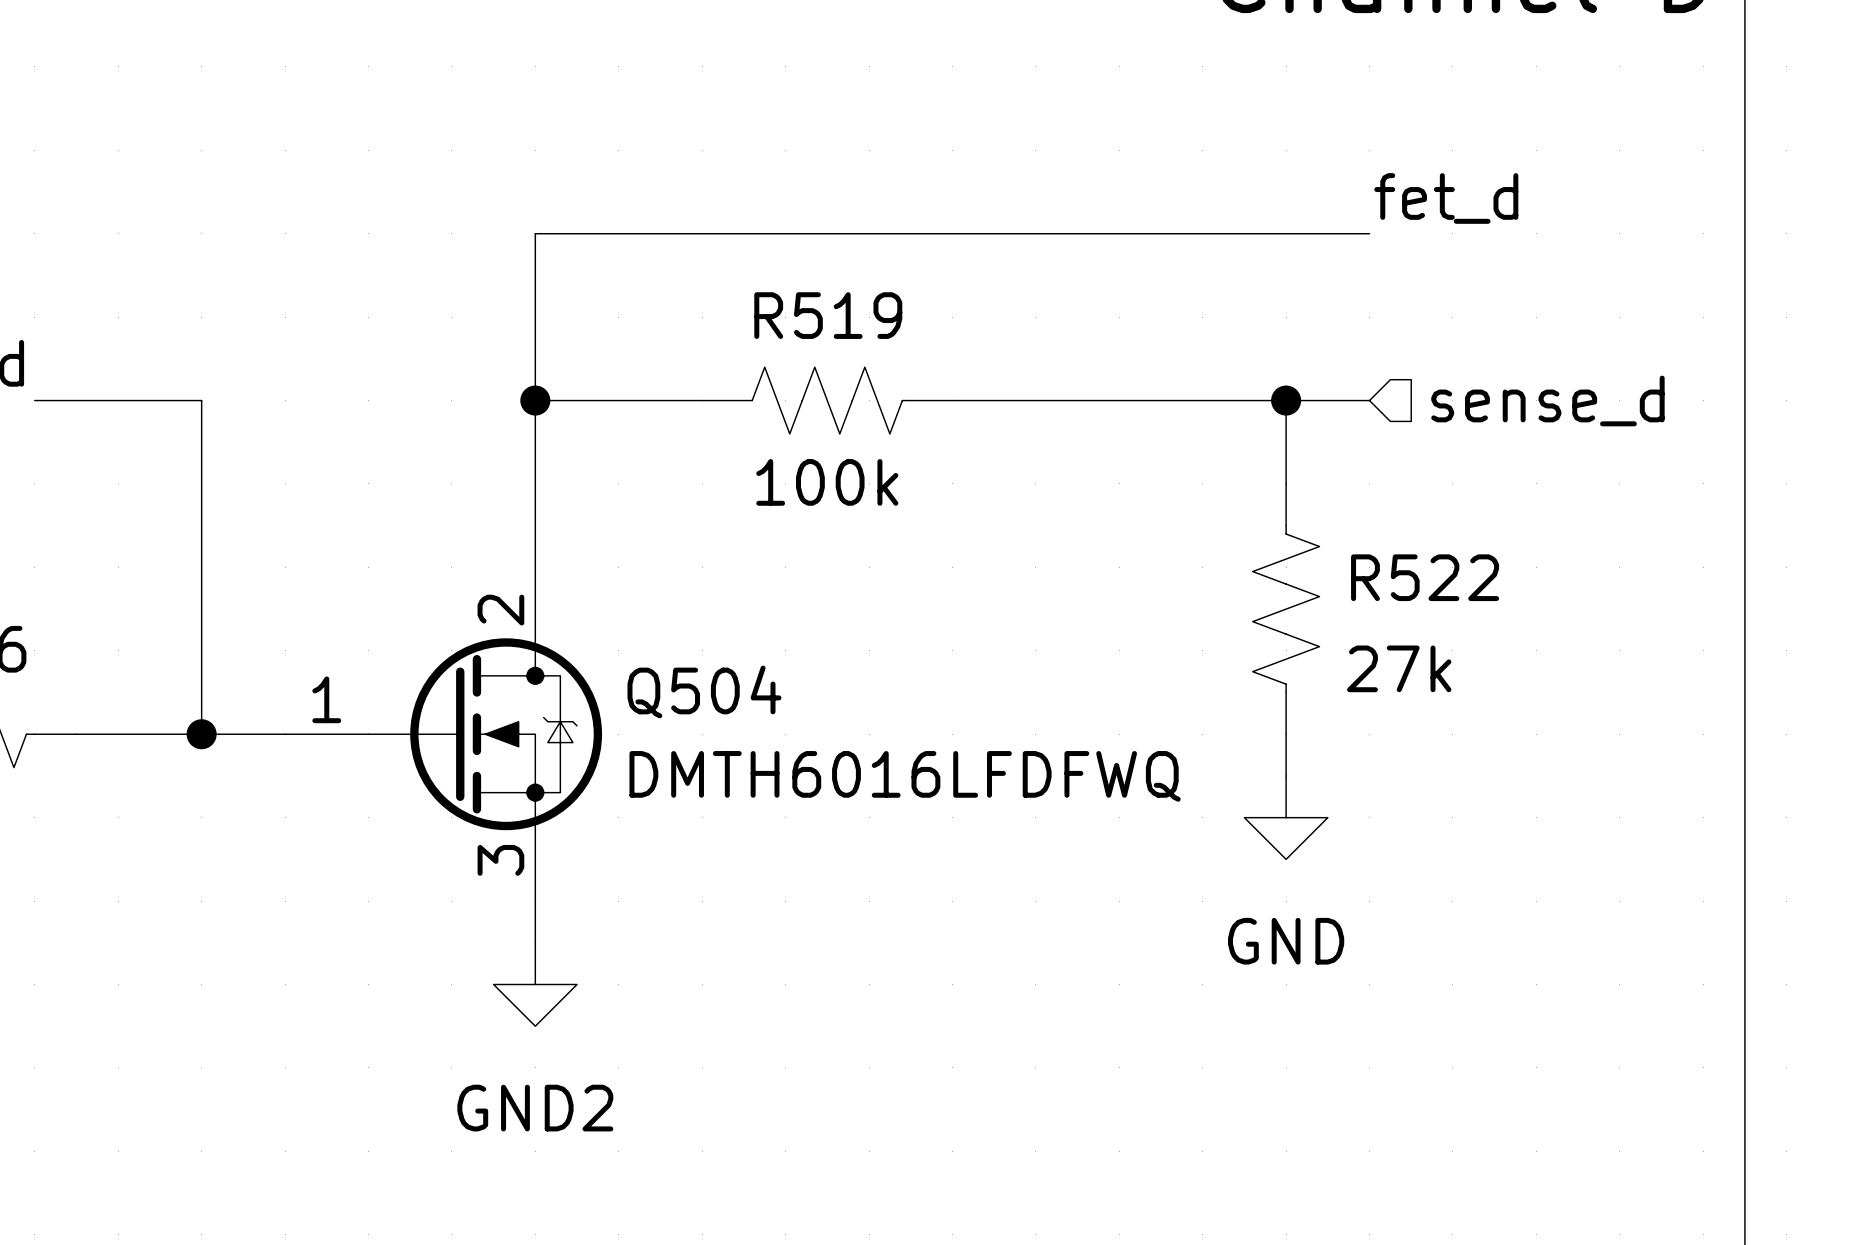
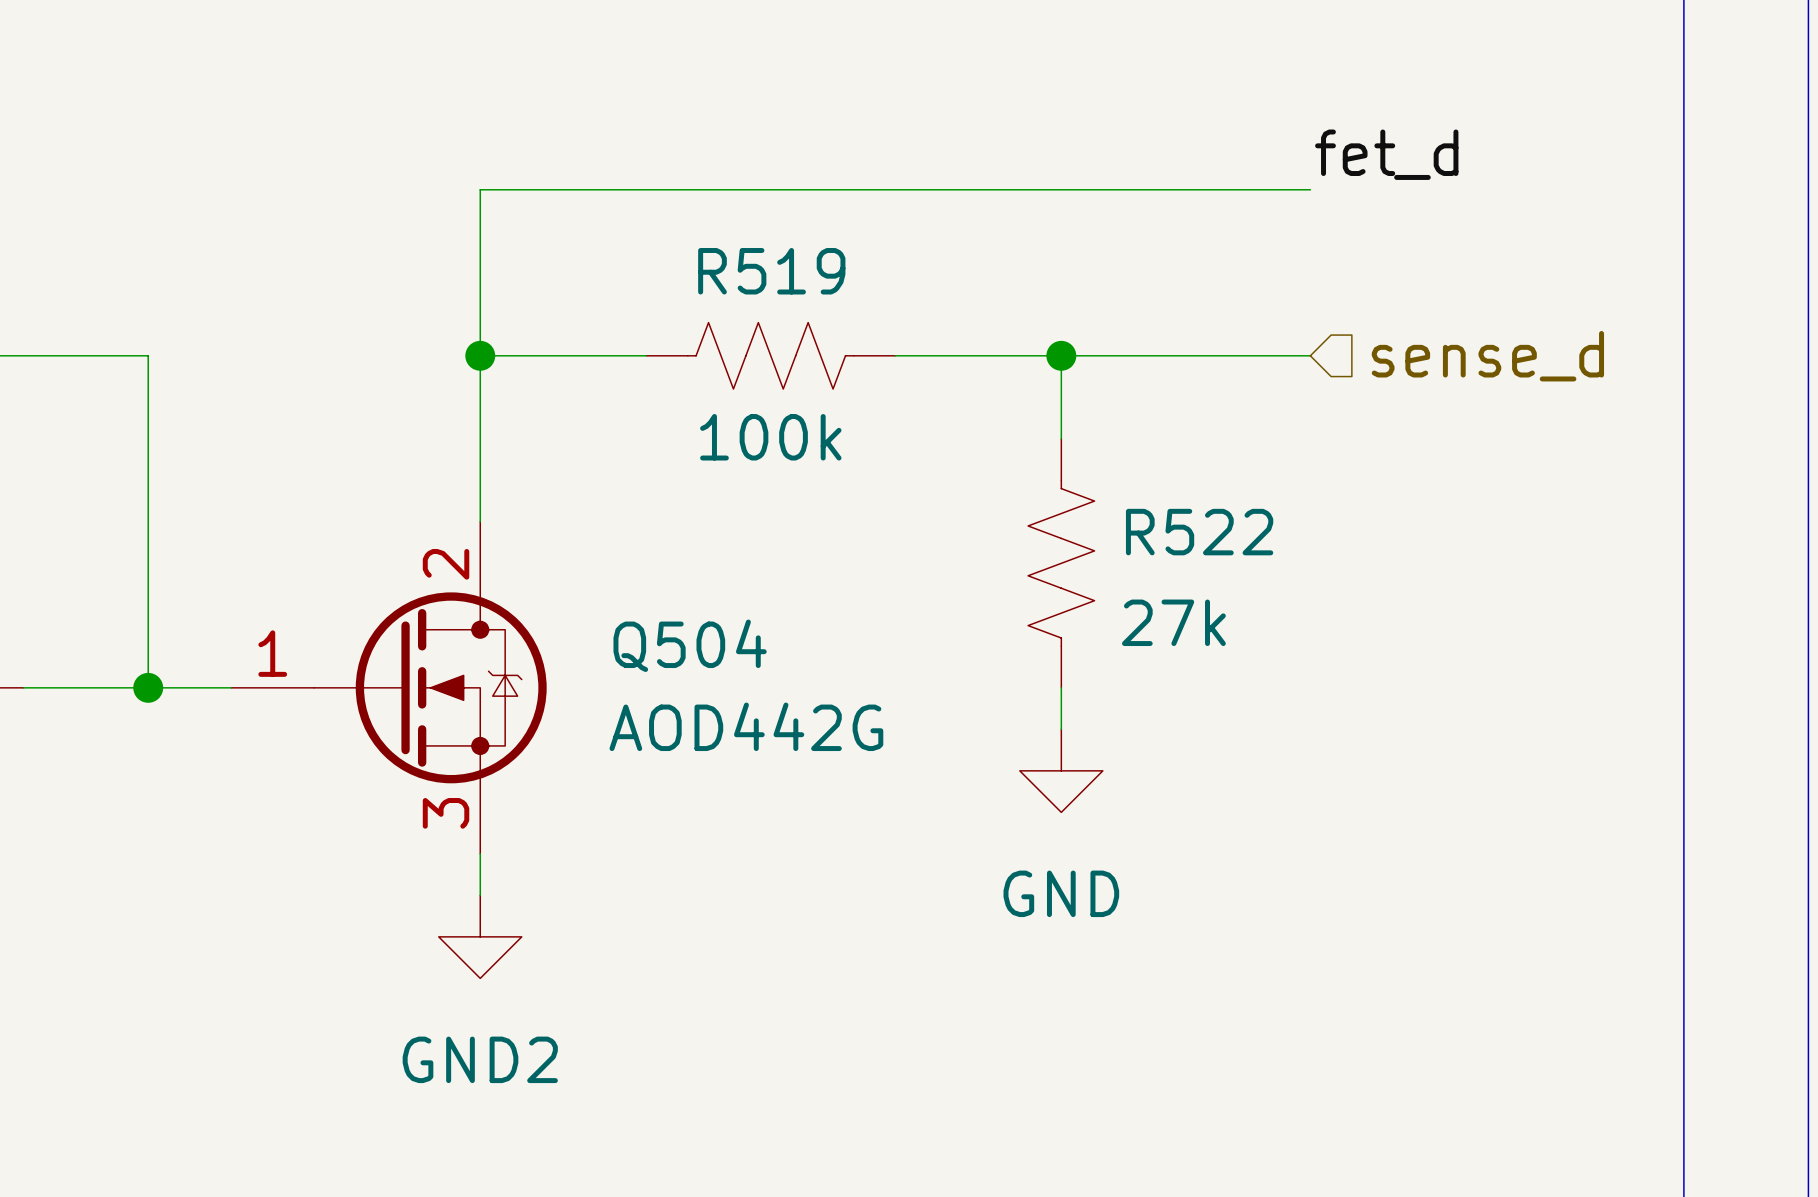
wire: (1286, 400) (1286, 483) -> (1061, 355) (1061, 438)
junction position: (1286, 400) -> (1061, 355)
R522 position: (1286, 609) -> (1061, 563)
Q504 name position: Q504 (704, 691) -> Q504 (690, 645)
wire: (1286, 734) (1286, 775) -> (1061, 687) (1061, 729)
Q504 value: DMTH6016LFDFWQ (905, 776) -> AOD442G (746, 726)
power symbol position: GND (1286, 817) -> GND (1061, 770)

